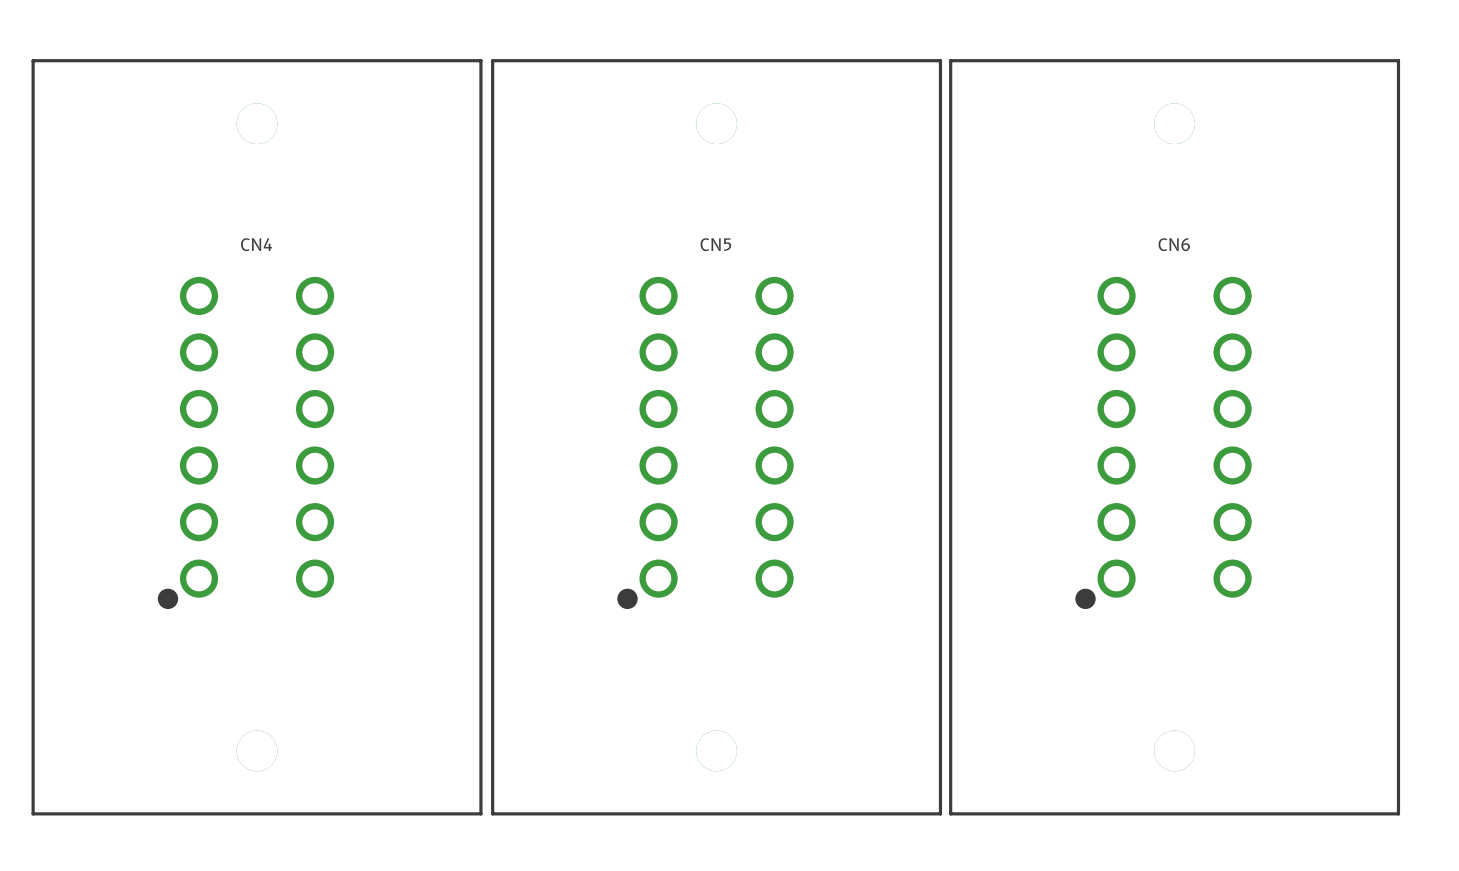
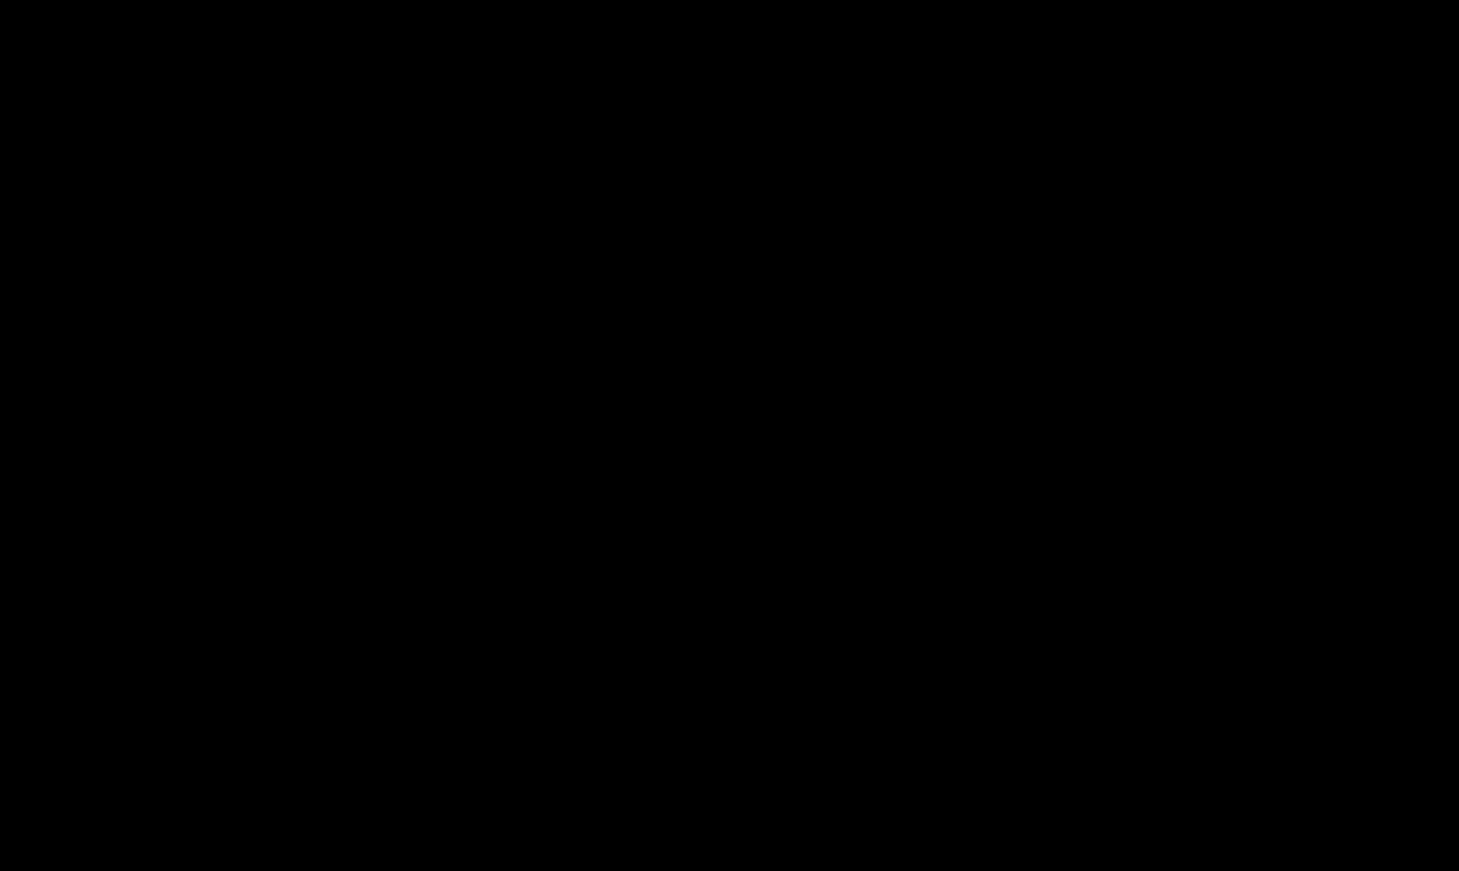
CN4: (257, 437) -> none
CN5: (716, 437) -> none
CN6: (1174, 437) -> none

